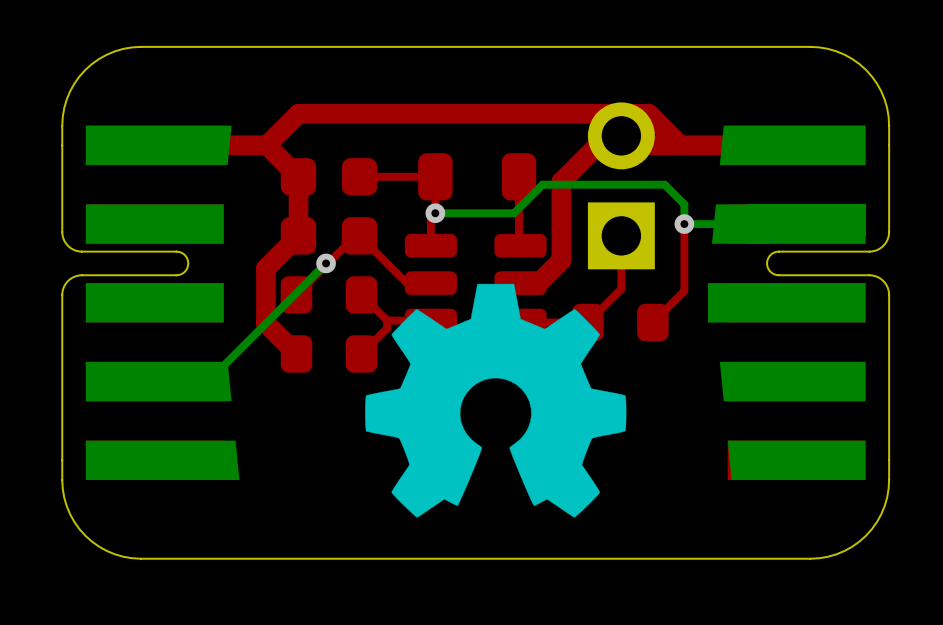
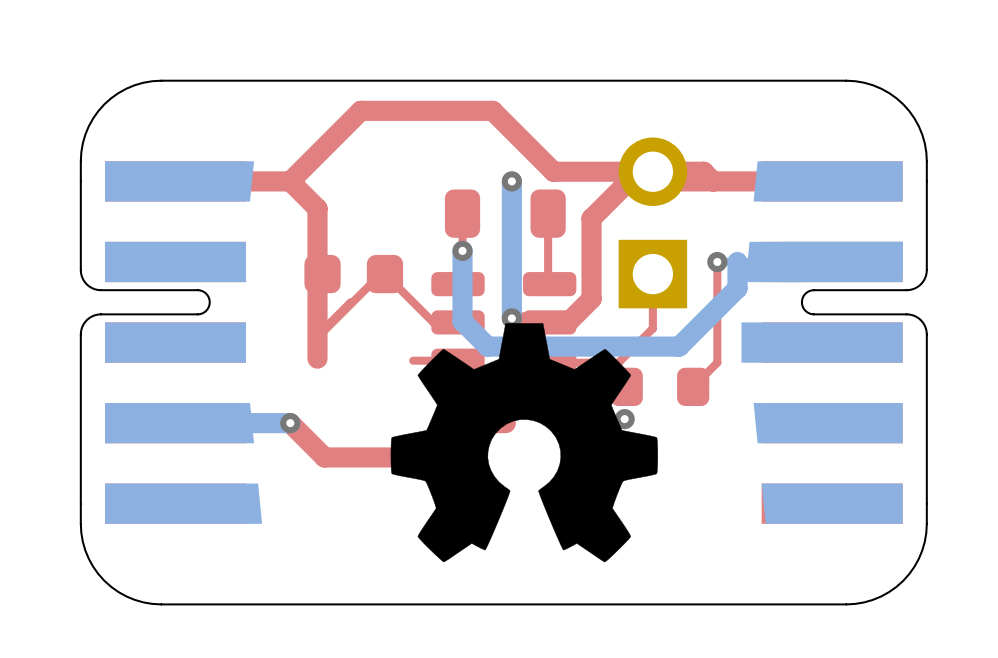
top track: (298, 113) (648, 113) (670, 135) -> (322, 149) (360, 110) (492, 110) (553, 171) (703, 171)
bottom track: none -> (511, 181) (511, 318)
via: none -> (511, 181)
top track: (293, 171) (298, 176) (298, 235) (265, 268) (265, 323) (296, 354) -> (317, 208) (317, 358)
part: (329, 176) -> none
top track: (435, 176) (359, 176) -> none
bottom track: (435, 213) (514, 213) (542, 184) (664, 184) (684, 204) (684, 224) -> (462, 250) (462, 321) (487, 346) (679, 346) (737, 288) (737, 261)
bottom track: (326, 263) (207, 381) -> (290, 423) (229, 423)
via: (326, 263) -> none
via: none -> (511, 318)
top track: (684, 291) (652, 322) -> (717, 330) (717, 362) (693, 386)
part: (329, 294) -> none
top track: (361, 294) (387, 320) (387, 328) (361, 354) -> none
part position: (620, 322) -> (659, 386)
part: (329, 354) -> none
via: none -> (624, 419)
via: none -> (290, 423)
top track: none -> (505, 423) (448, 423) (414, 457) (324, 457) (290, 423)

